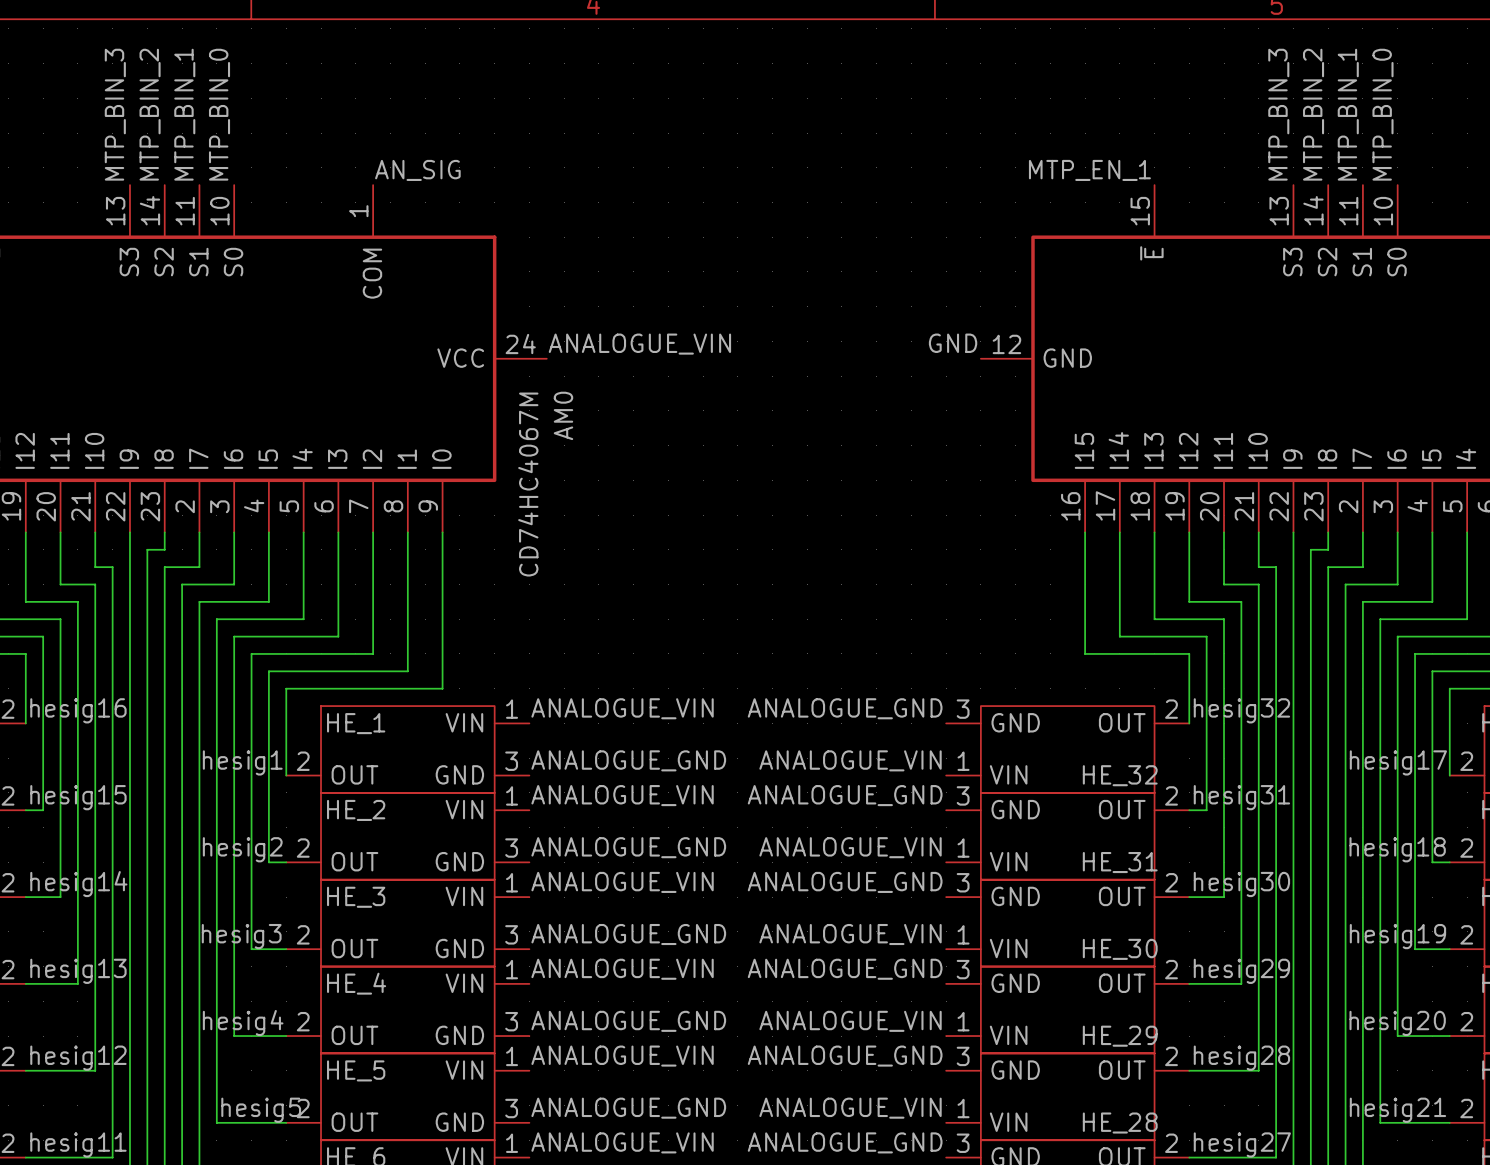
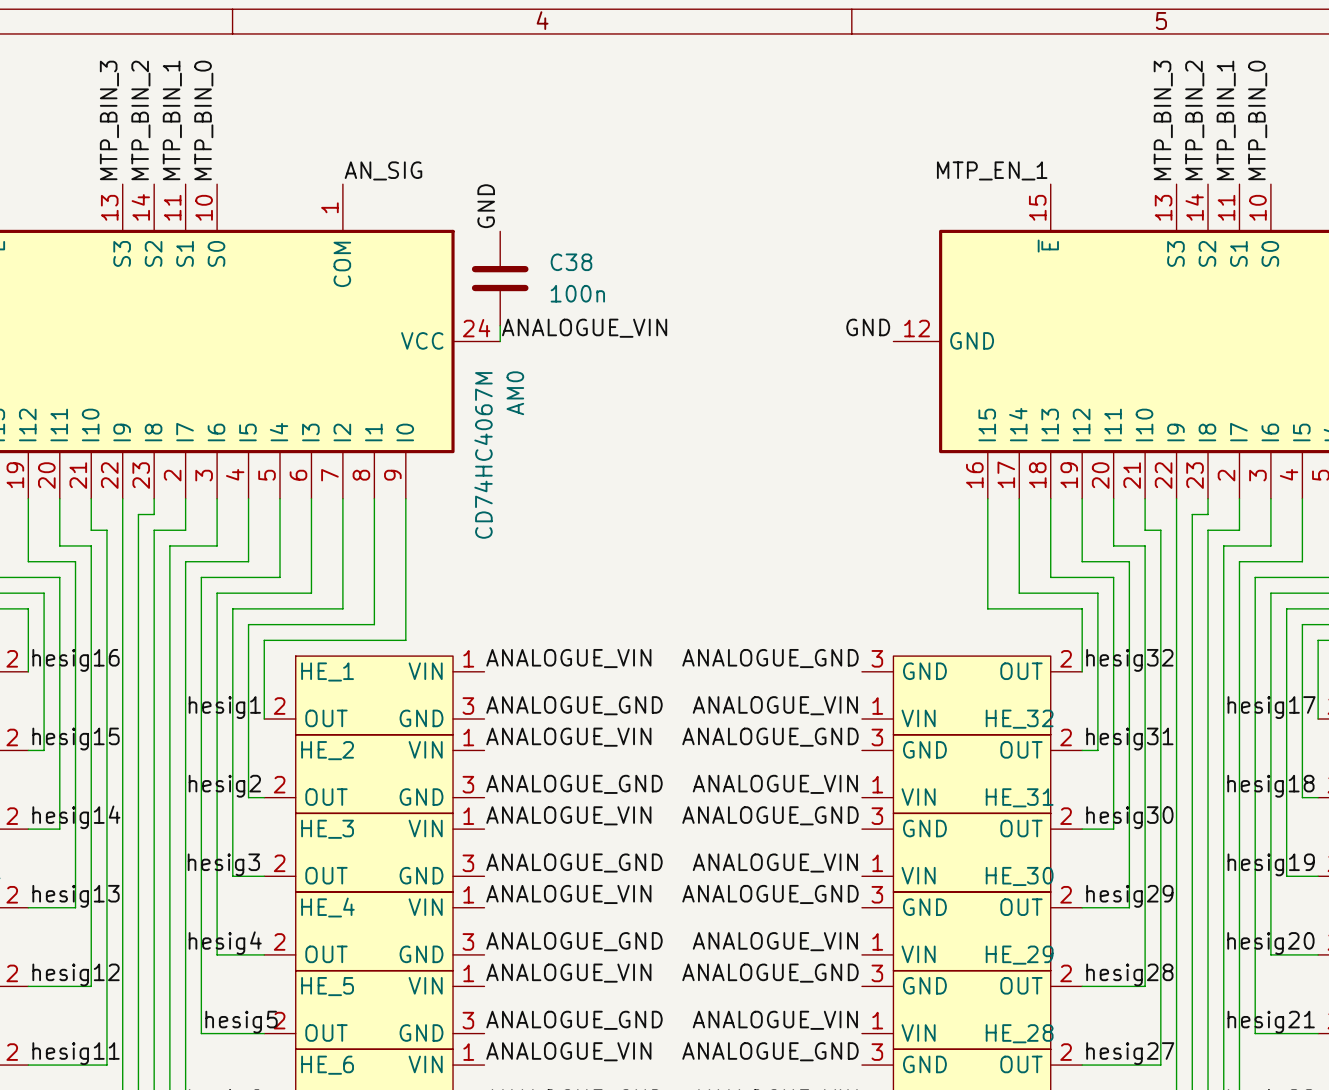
label: none -> GND (486, 206)
C38: none -> 100n (500, 278)
wire: none -> (500, 325) (500, 341)

